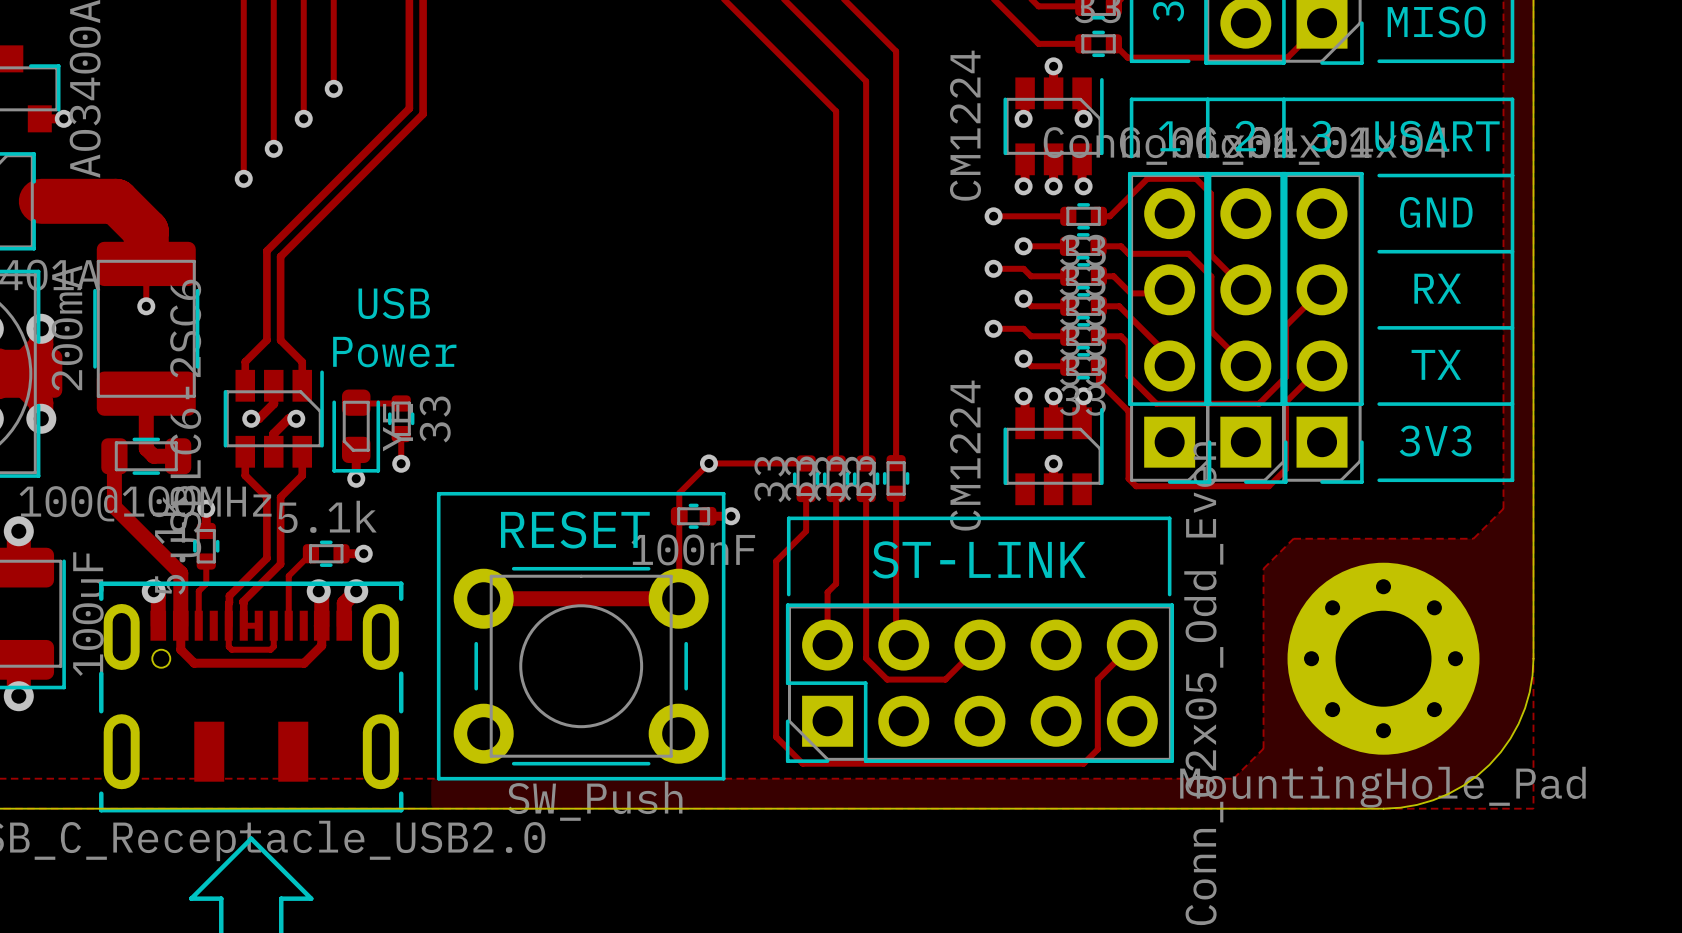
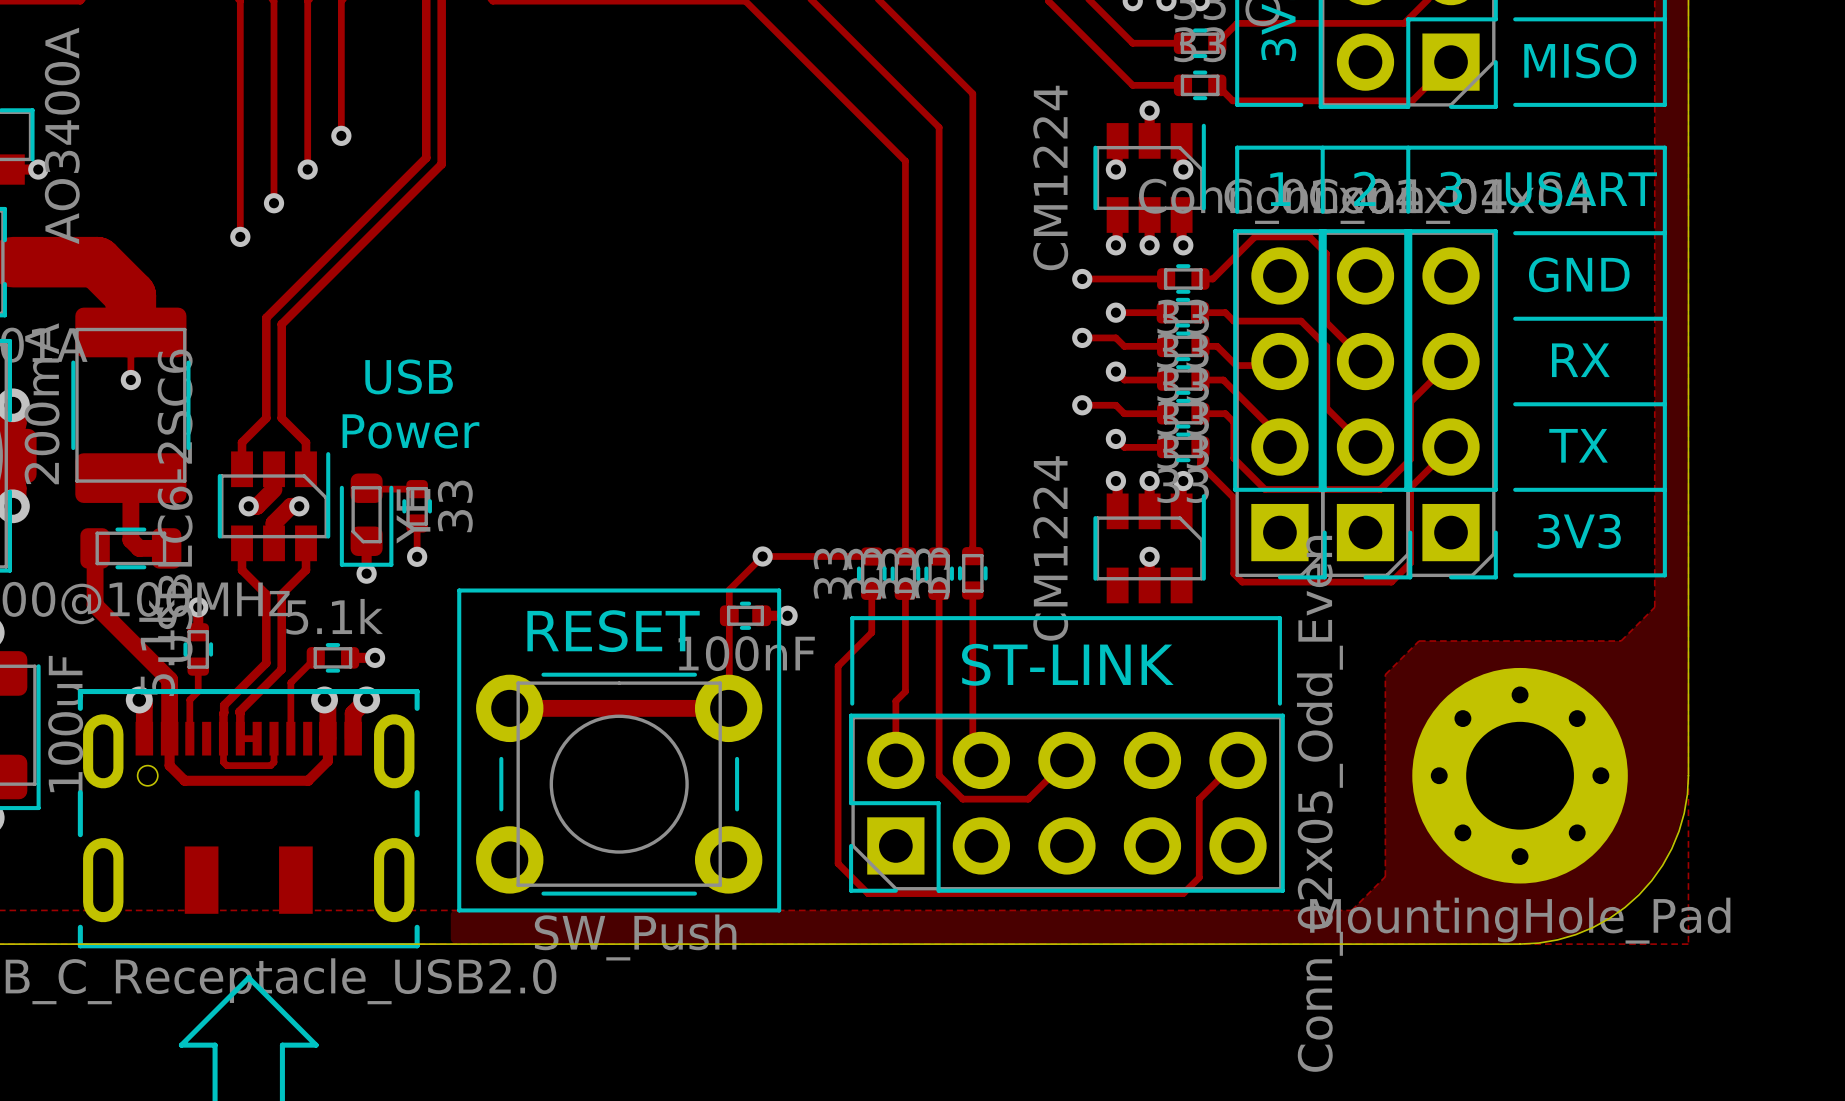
track width: thin (273, 403) (258, 418) (251, 418) -> thick (274, 489) (257, 506) (248, 506)
track width: thin (296, 418) (288, 418) (273, 433) (273, 451) -> thick (299, 506) (290, 506) (274, 523) (274, 543)

